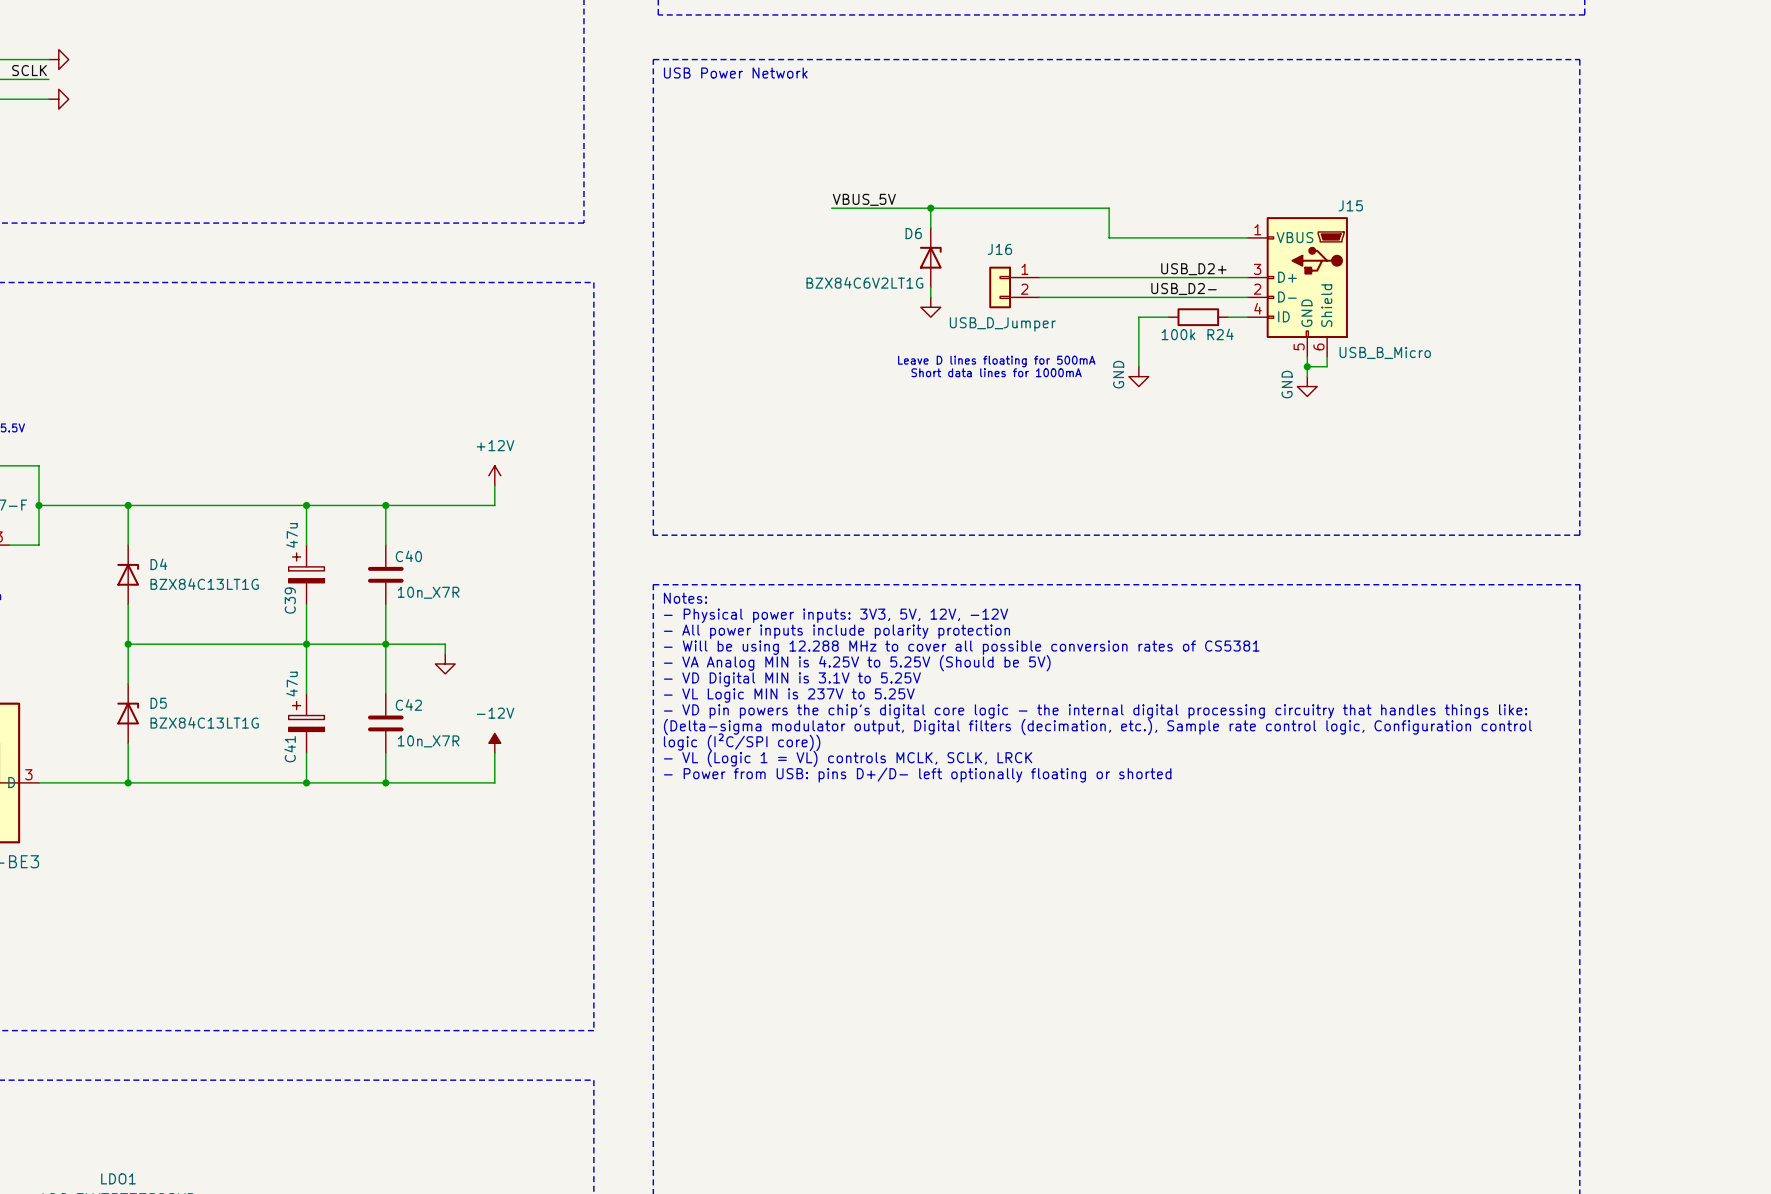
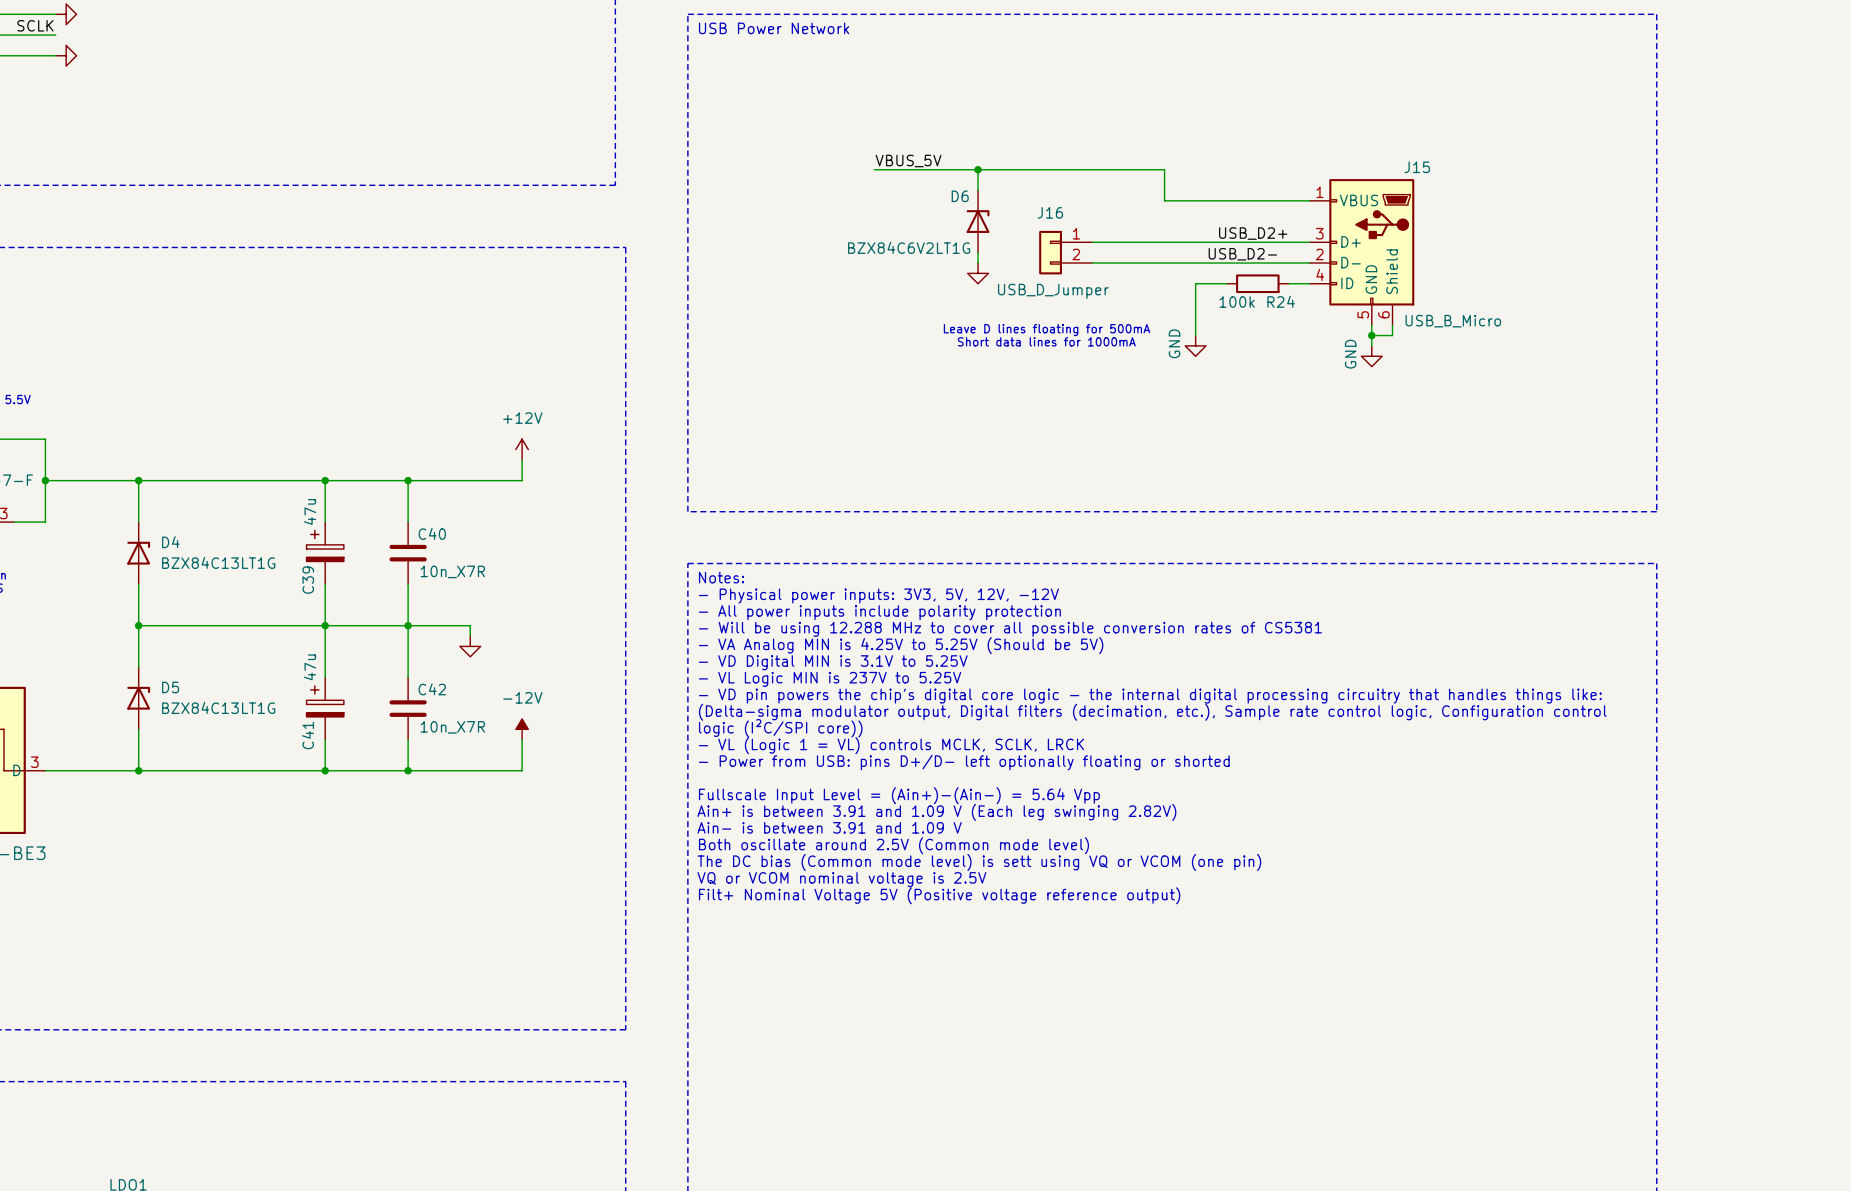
text: none -> Fullscale Input Level = (Ain+)-(Ain-) = 5.64 Vpp (899, 795)
text: none -> Ain+ is between 3.91 and 1.09 V (Each leg swinging 2.82V) (936, 812)
text: none -> Ain- is between 3.91 and 1.09 V (829, 827)
text: none -> Both oscillate around 2.5V (Common mode level) (893, 845)
text: none -> The DC bias (Common mode level) is sett using VQ or VCOM (one pin) (979, 862)
text: none -> VQ or VCOM nominal voltage is 2.5V (841, 879)
text: none -> Filt+ Nominal Voltage 5V (Positive voltage reference output) (939, 895)

